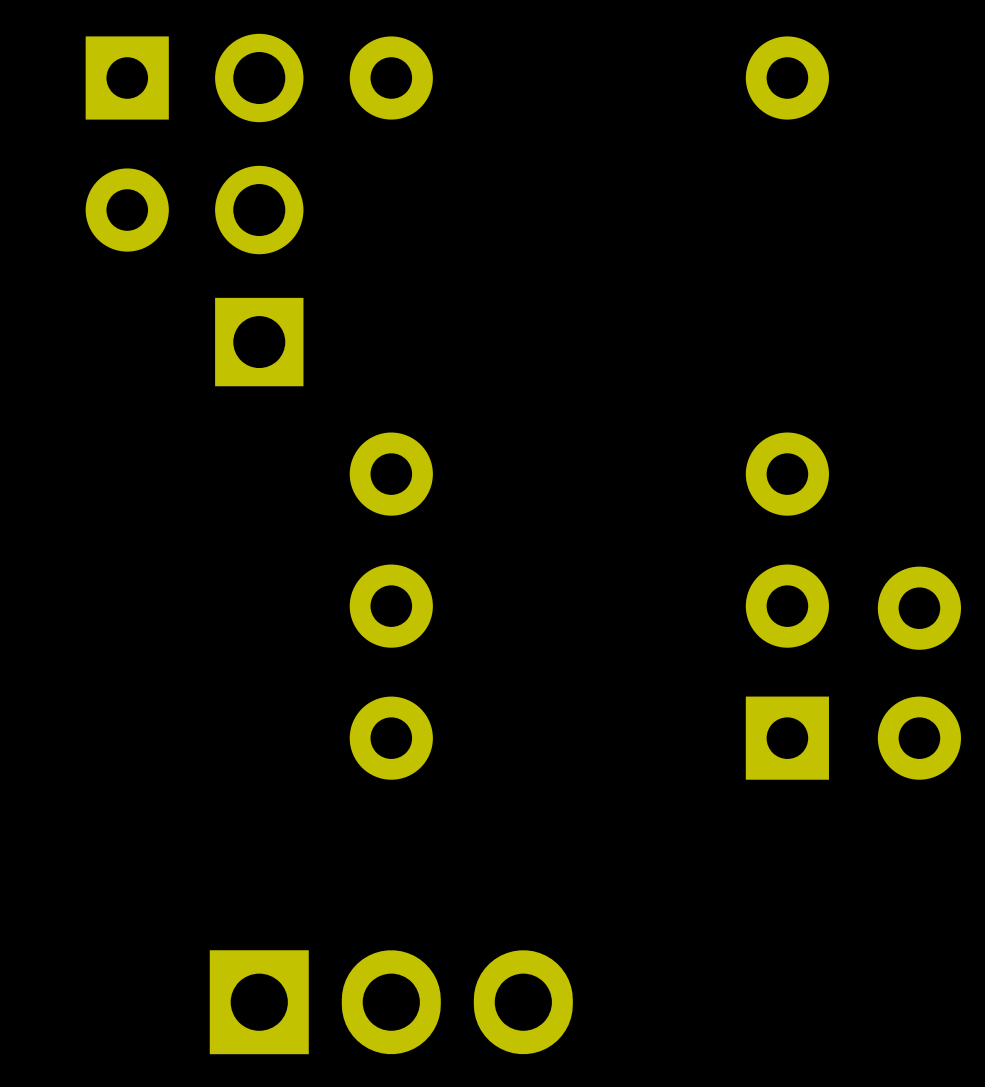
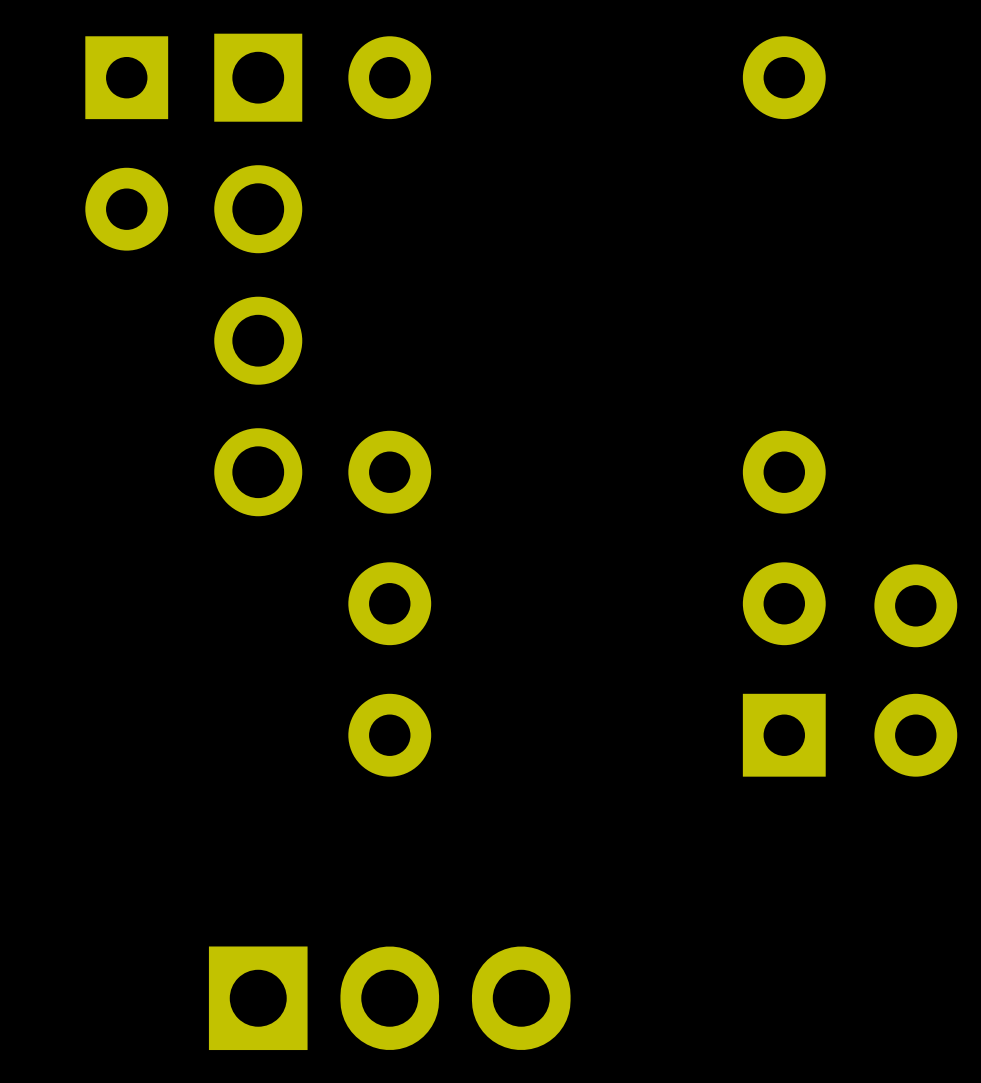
part: (259, 210) -> none
part: none -> (258, 274)

